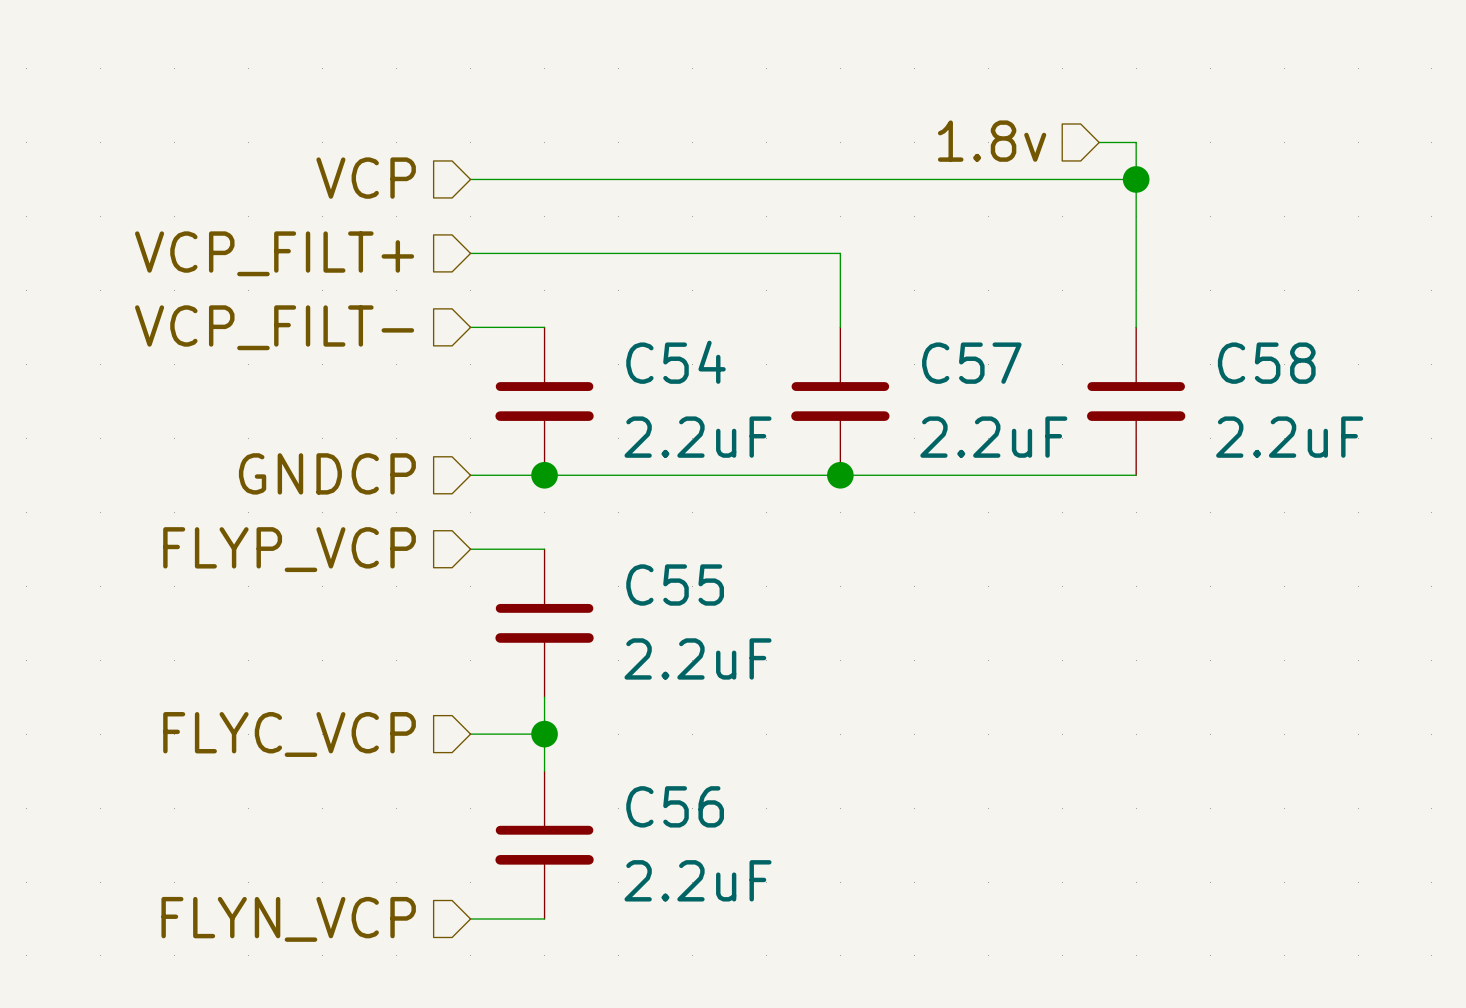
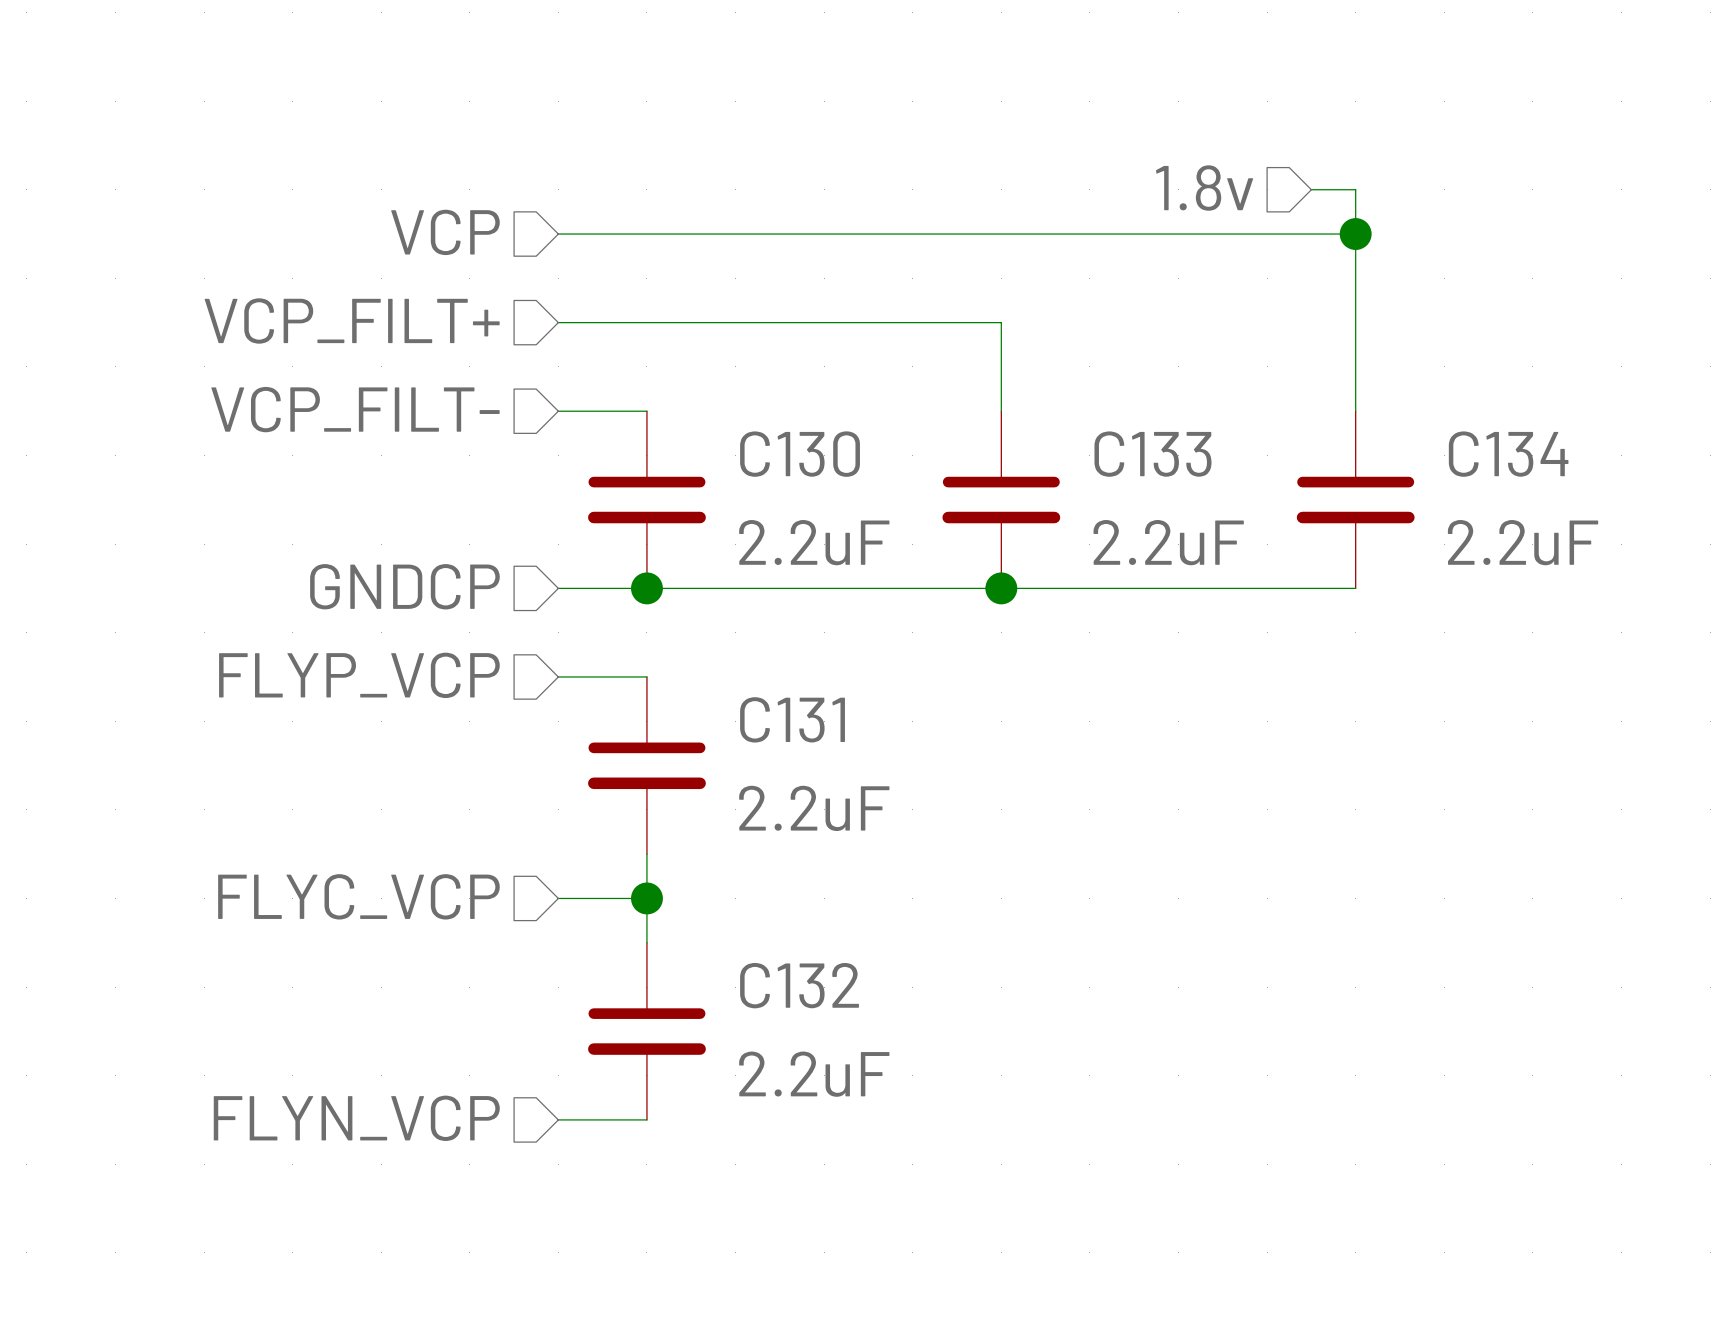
C54 name: C54 (676, 362) -> C130 (800, 454)
C57 name: C57 (971, 363) -> C133 (1153, 454)
C58 name: C58 (1266, 363) -> C134 (1508, 454)
C55 name: C55 (675, 585) -> C131 (792, 719)
C56 name: C56 (675, 806) -> C132 (799, 985)

